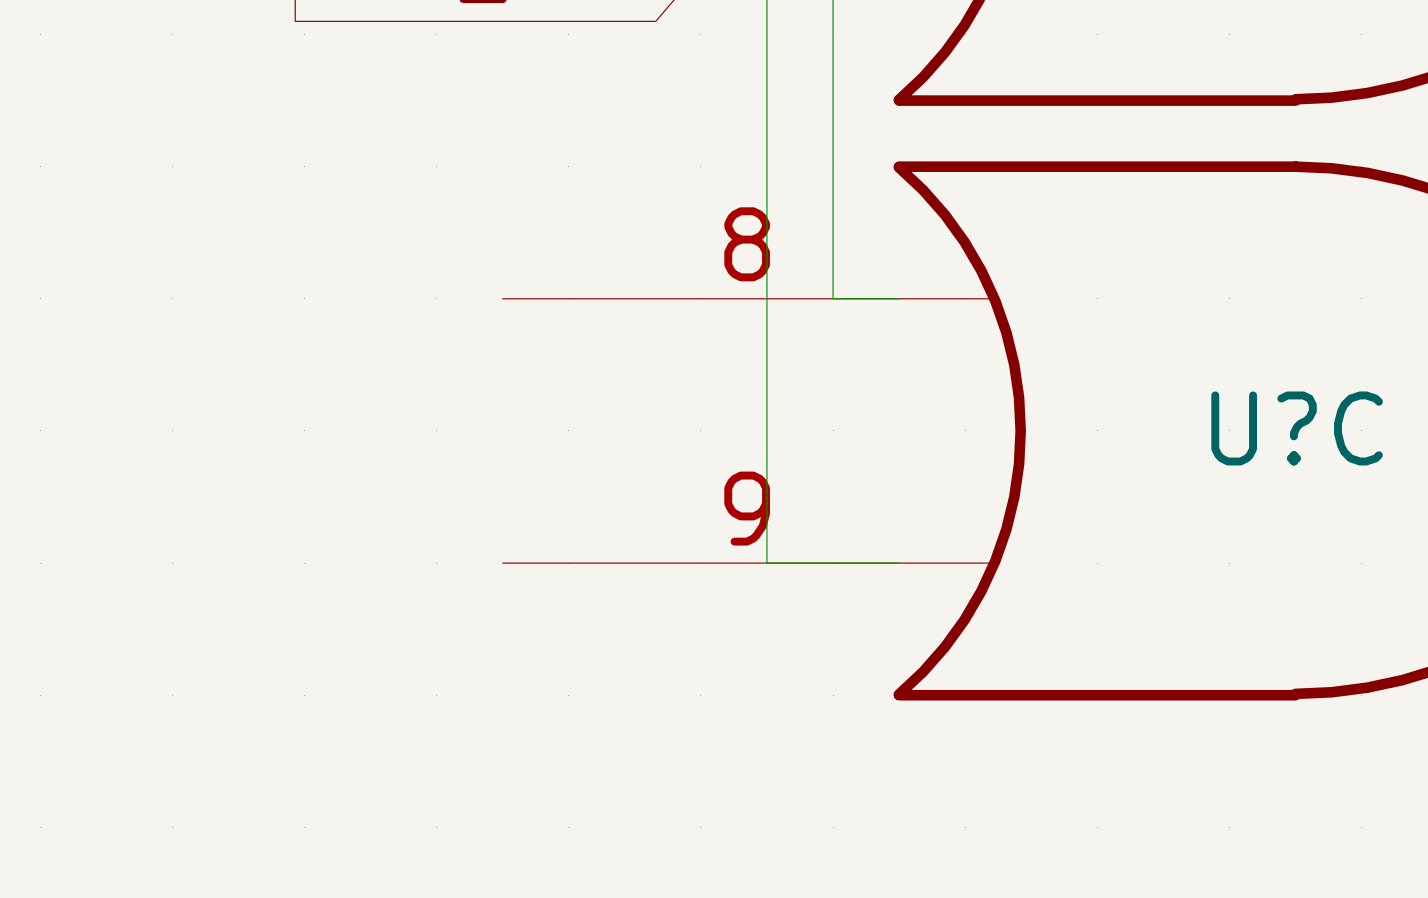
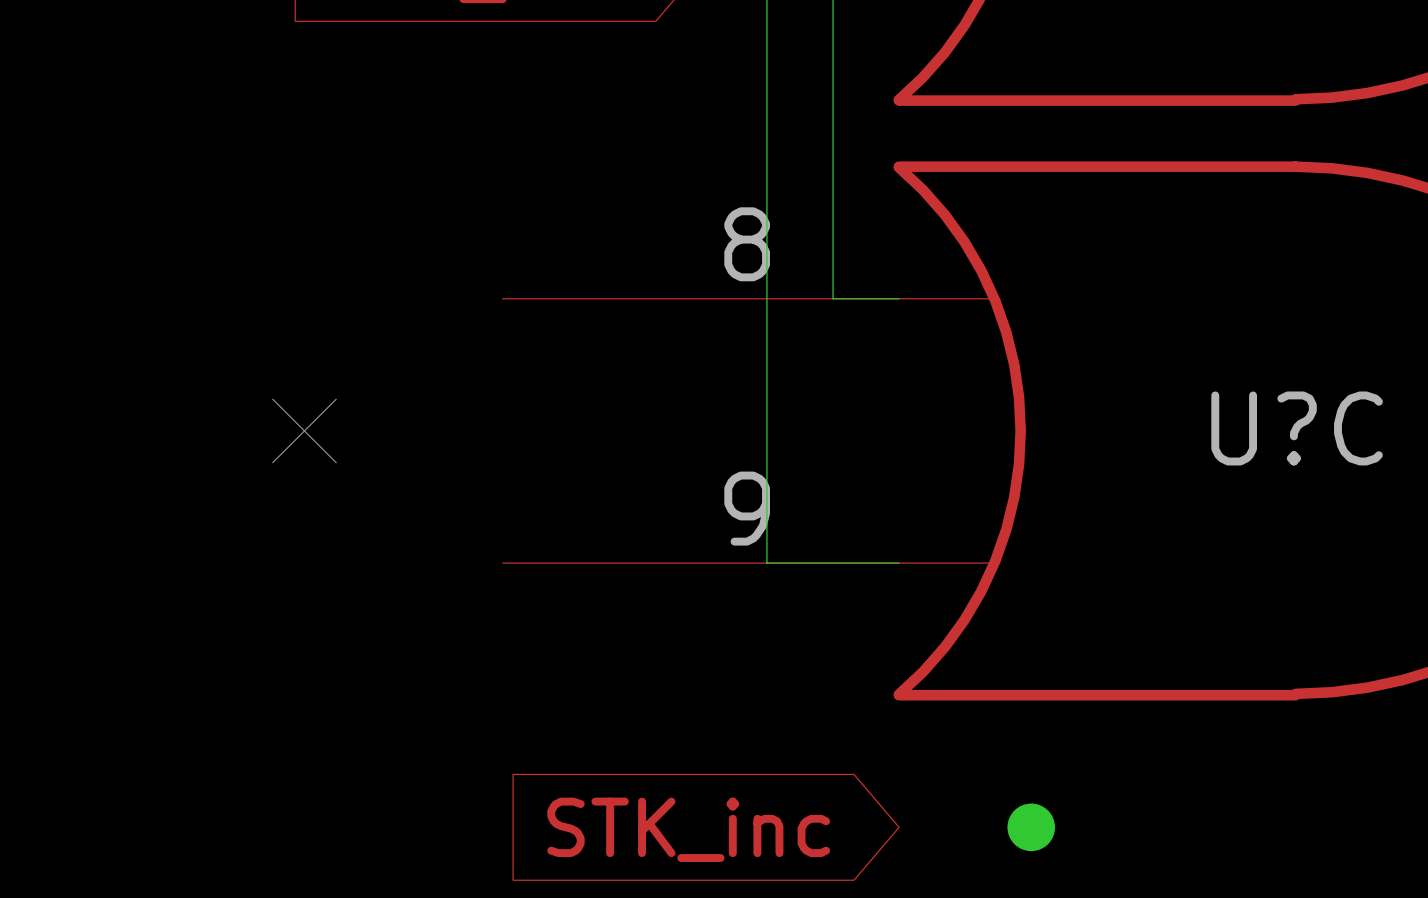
no-connect mark: none -> (304, 430)
junction: none -> (1031, 827)
global label: none -> STK_inc (688, 829)

